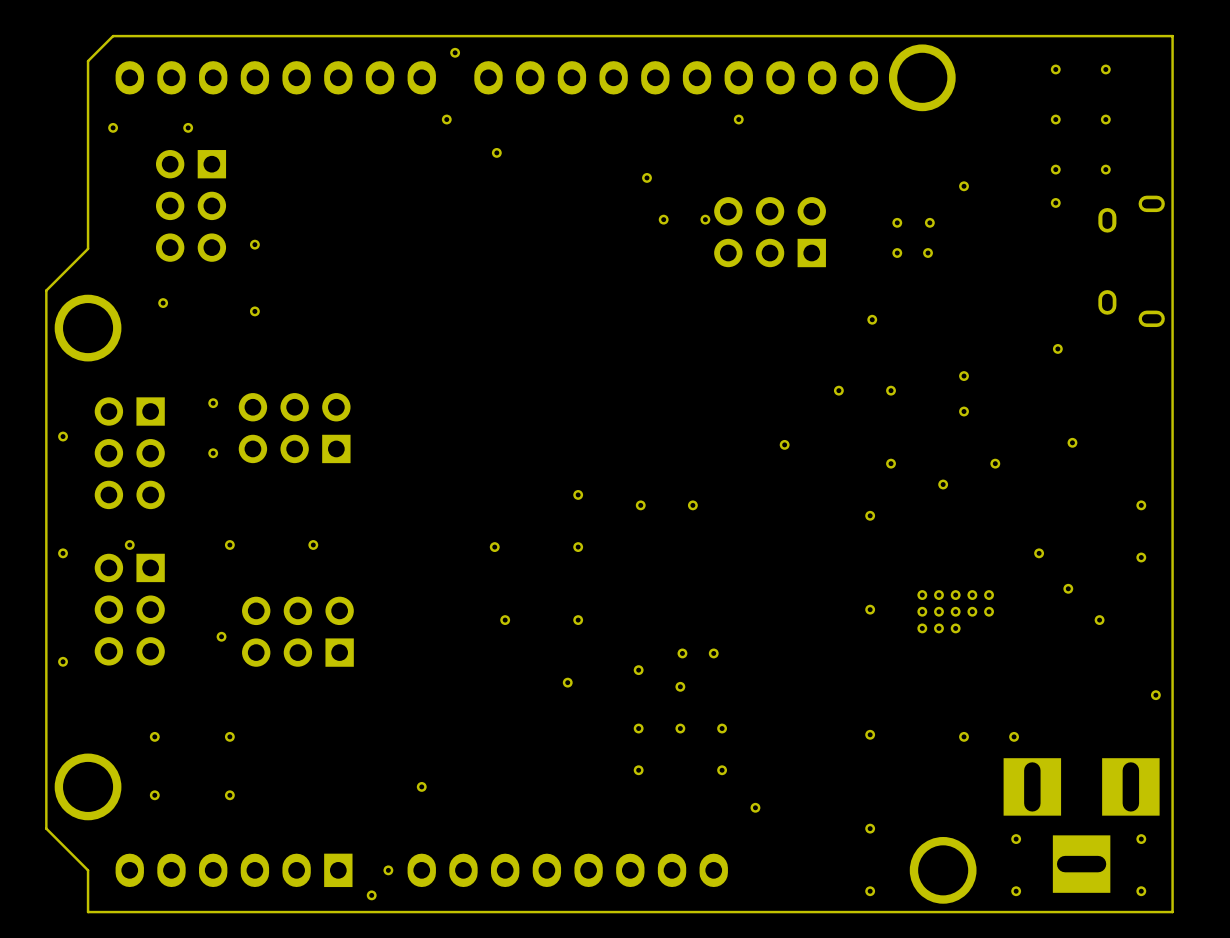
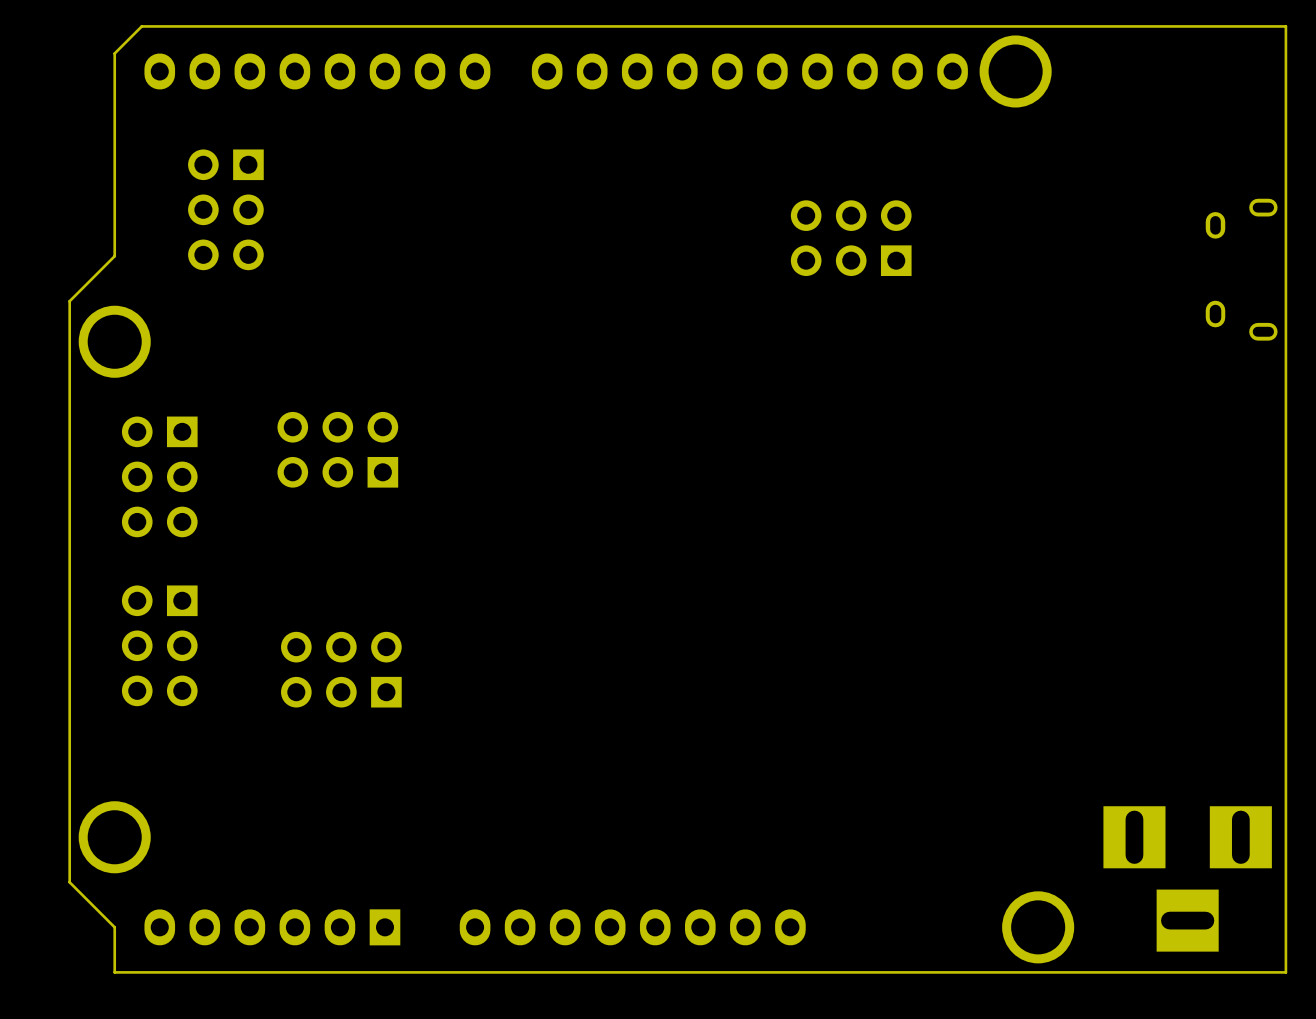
part: (455, 52) -> none
part: (1055, 69) -> none
part: (1105, 69) -> none
part: (446, 119) -> none
part: (738, 119) -> none
part: (1055, 119) -> none
part: (1105, 119) -> none
part: (113, 127) -> none
part: (188, 127) -> none
part: (496, 152) -> none
part: (1055, 169) -> none
part: (1105, 169) -> none
part: (647, 177) -> none
part: (964, 186) -> none
part: (1055, 202) -> none
part: (663, 219) -> none
part: (705, 219) -> none
part: (897, 222) -> none
part: (929, 222) -> none
part: (254, 244) -> none
part: (897, 253) -> none
part: (928, 253) -> none
part: (163, 303) -> none
part: (254, 311) -> none
part: (872, 319) -> none
part: (1057, 348) -> none
part: (964, 376) -> none
part: (838, 390) -> none
part: (891, 390) -> none
part: (213, 403) -> none
part: (964, 411) -> none
part: (63, 436) -> none
part: (1072, 442) -> none
part: (784, 444) -> none
part: (213, 453) -> none
part: (891, 463) -> none
part: (995, 463) -> none
part: (943, 484) -> none
part: (578, 494) -> none
part: (640, 505) -> none
part: (692, 505) -> none
part: (1141, 505) -> none
part: (870, 515) -> none
part: (129, 544) -> none
part: (229, 544) -> none
part: (313, 544) -> none
part: (494, 547) -> none
part: (578, 547) -> none
part: (63, 553) -> none
part: (1039, 553) -> none
part: (1141, 557) -> none
part: (1068, 588) -> none
part: (922, 595) -> none
part: (938, 595) -> none
part: (955, 595) -> none
part: (972, 595) -> none
part: (989, 595) -> none
part: (870, 609) -> none
part: (922, 611) -> none
part: (938, 611) -> none
part: (955, 611) -> none
part: (972, 611) -> none
part: (989, 611) -> none
part: (505, 620) -> none
part: (578, 620) -> none
part: (1099, 620) -> none
part: (922, 628) -> none
part: (938, 628) -> none
part: (955, 628) -> none
part: (221, 636) -> none
part: (682, 653) -> none
part: (713, 653) -> none
part: (63, 661) -> none
part: (638, 670) -> none
part: (567, 682) -> none
part: (680, 686) -> none
part: (1155, 695) -> none
part: (638, 728) -> none
part: (680, 728) -> none
part: (722, 728) -> none
part: (870, 734) -> none
part: (154, 736) -> none
part: (229, 736) -> none
part: (964, 736) -> none
part: (1014, 736) -> none
part: (638, 770) -> none
part: (722, 770) -> none
part: (421, 786) -> none
part: (154, 795) -> none
part: (229, 795) -> none
part: (755, 807) -> none
part: (870, 828) -> none
part: (1016, 839) -> none
part: (1141, 839) -> none
part: (388, 870) -> none
part: (870, 891) -> none
part: (1016, 891) -> none
part: (1141, 891) -> none
part: (371, 895) -> none

